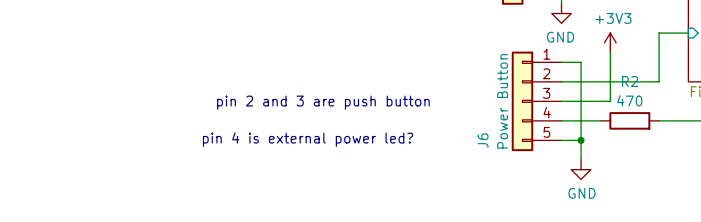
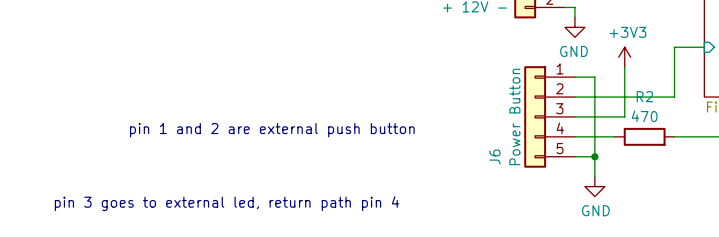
text: pin 2 and 3 are push button (323, 102) -> pin 1 and 2 are external push button (272, 130)
text: pin 4 is external power led? (308, 139) -> none
text: none -> pin 3 goes to external led, return path pin 4 (227, 203)

